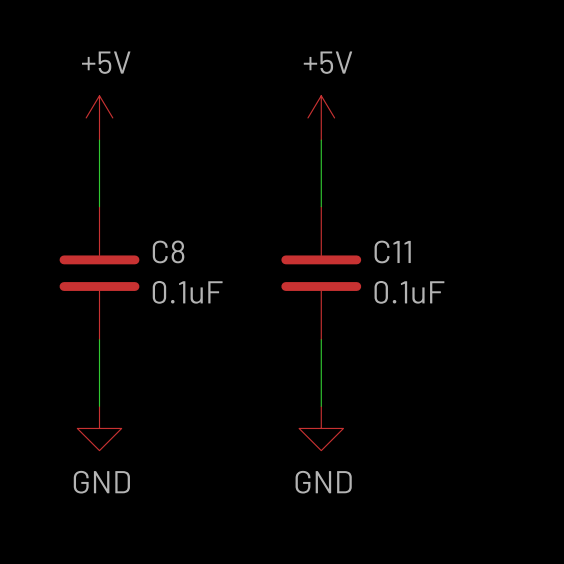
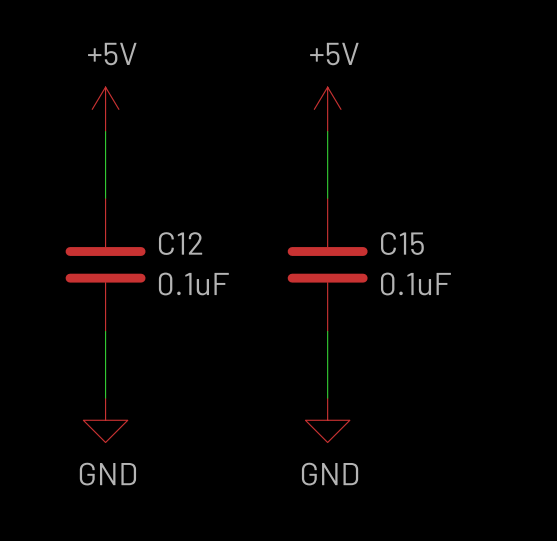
C8 name: C8 (168, 251) -> C12 (180, 243)
C11 name: C11 (392, 251) -> C15 (402, 243)

